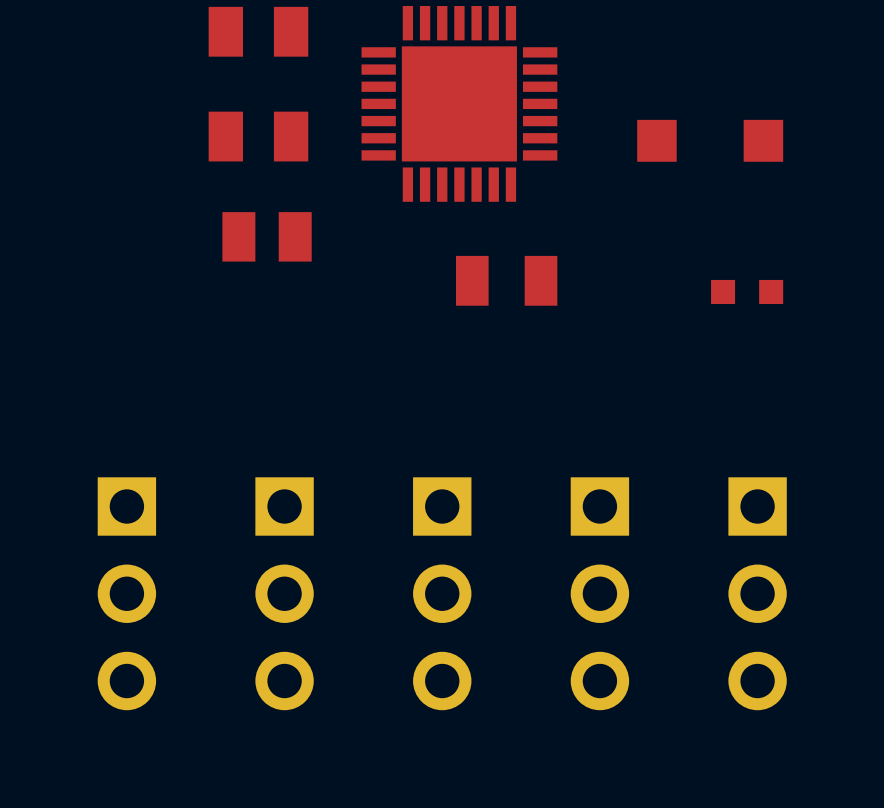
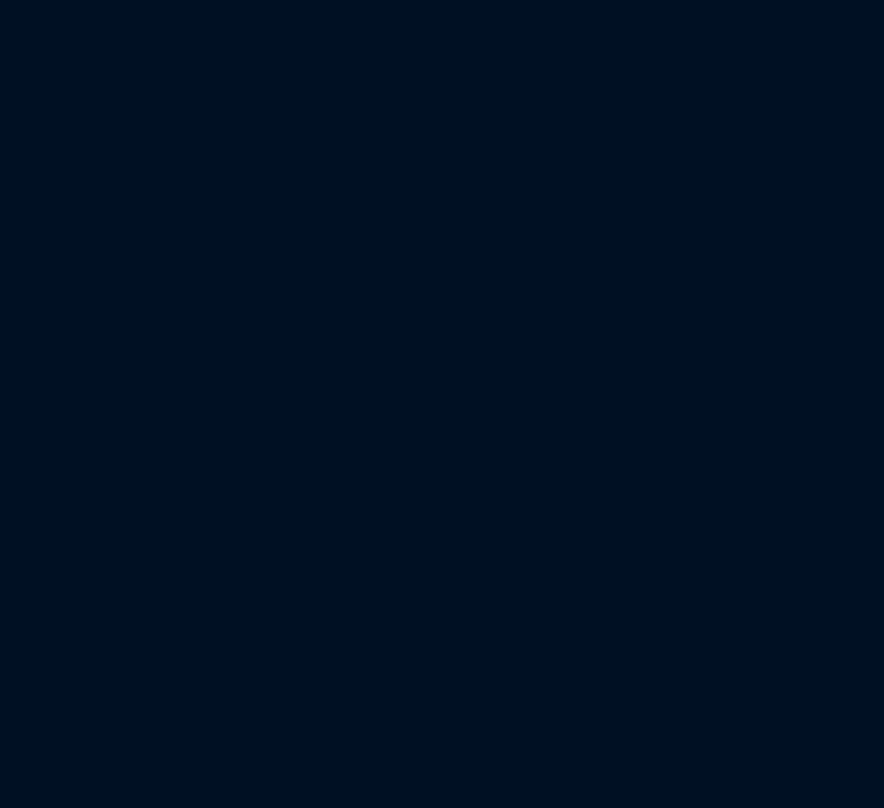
part: (258, 31) -> none
part: (459, 103) -> none
part: (258, 136) -> none
part: (710, 140) -> none
part: (267, 236) -> none
part: (506, 280) -> none
part: (747, 291) -> none
part: (126, 593) -> none
part: (284, 593) -> none
part: (442, 593) -> none
part: (599, 593) -> none
part: (757, 593) -> none

